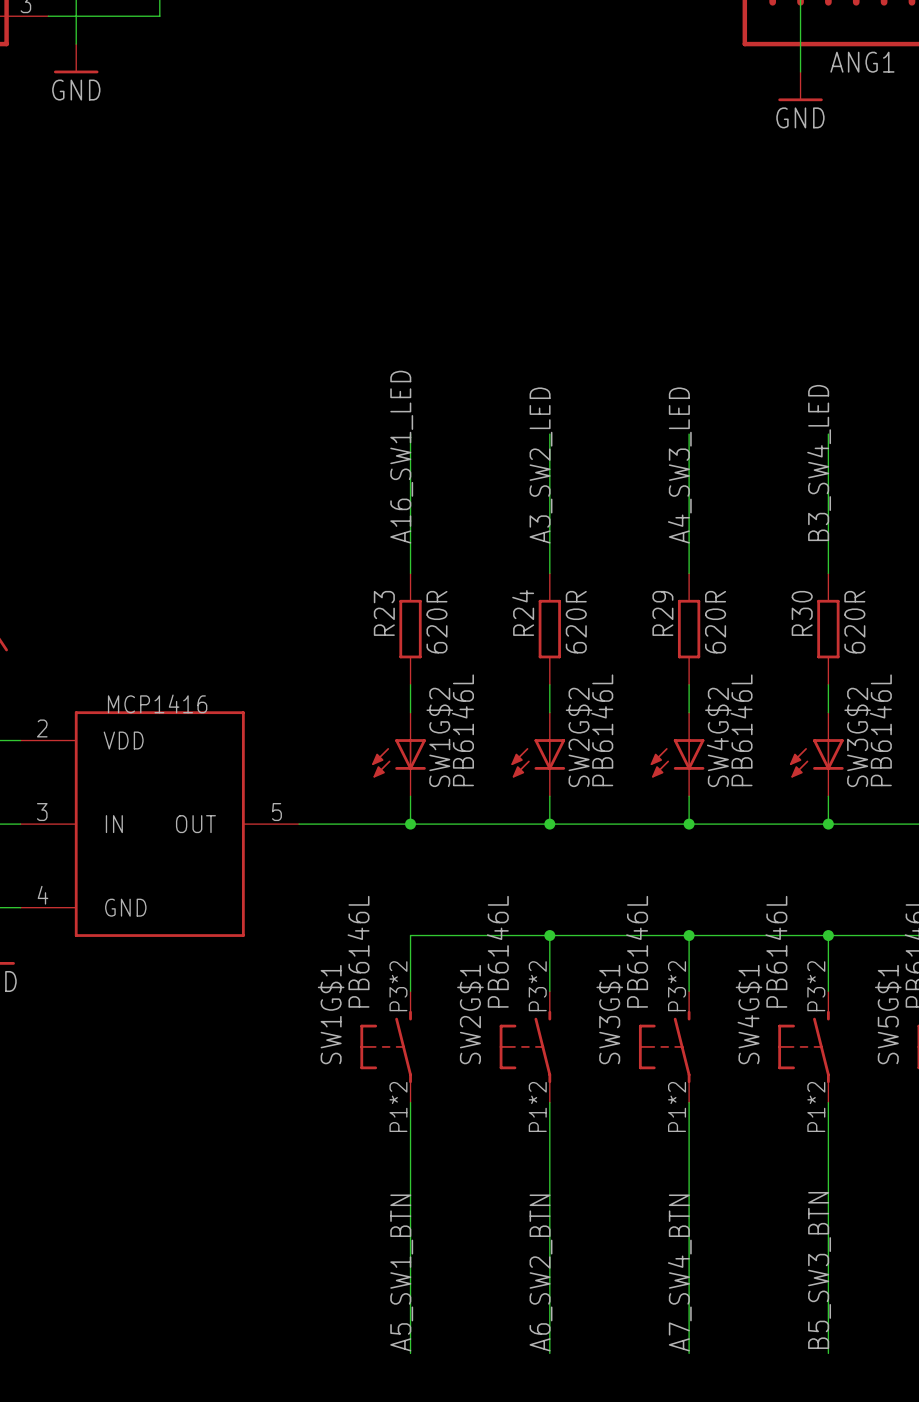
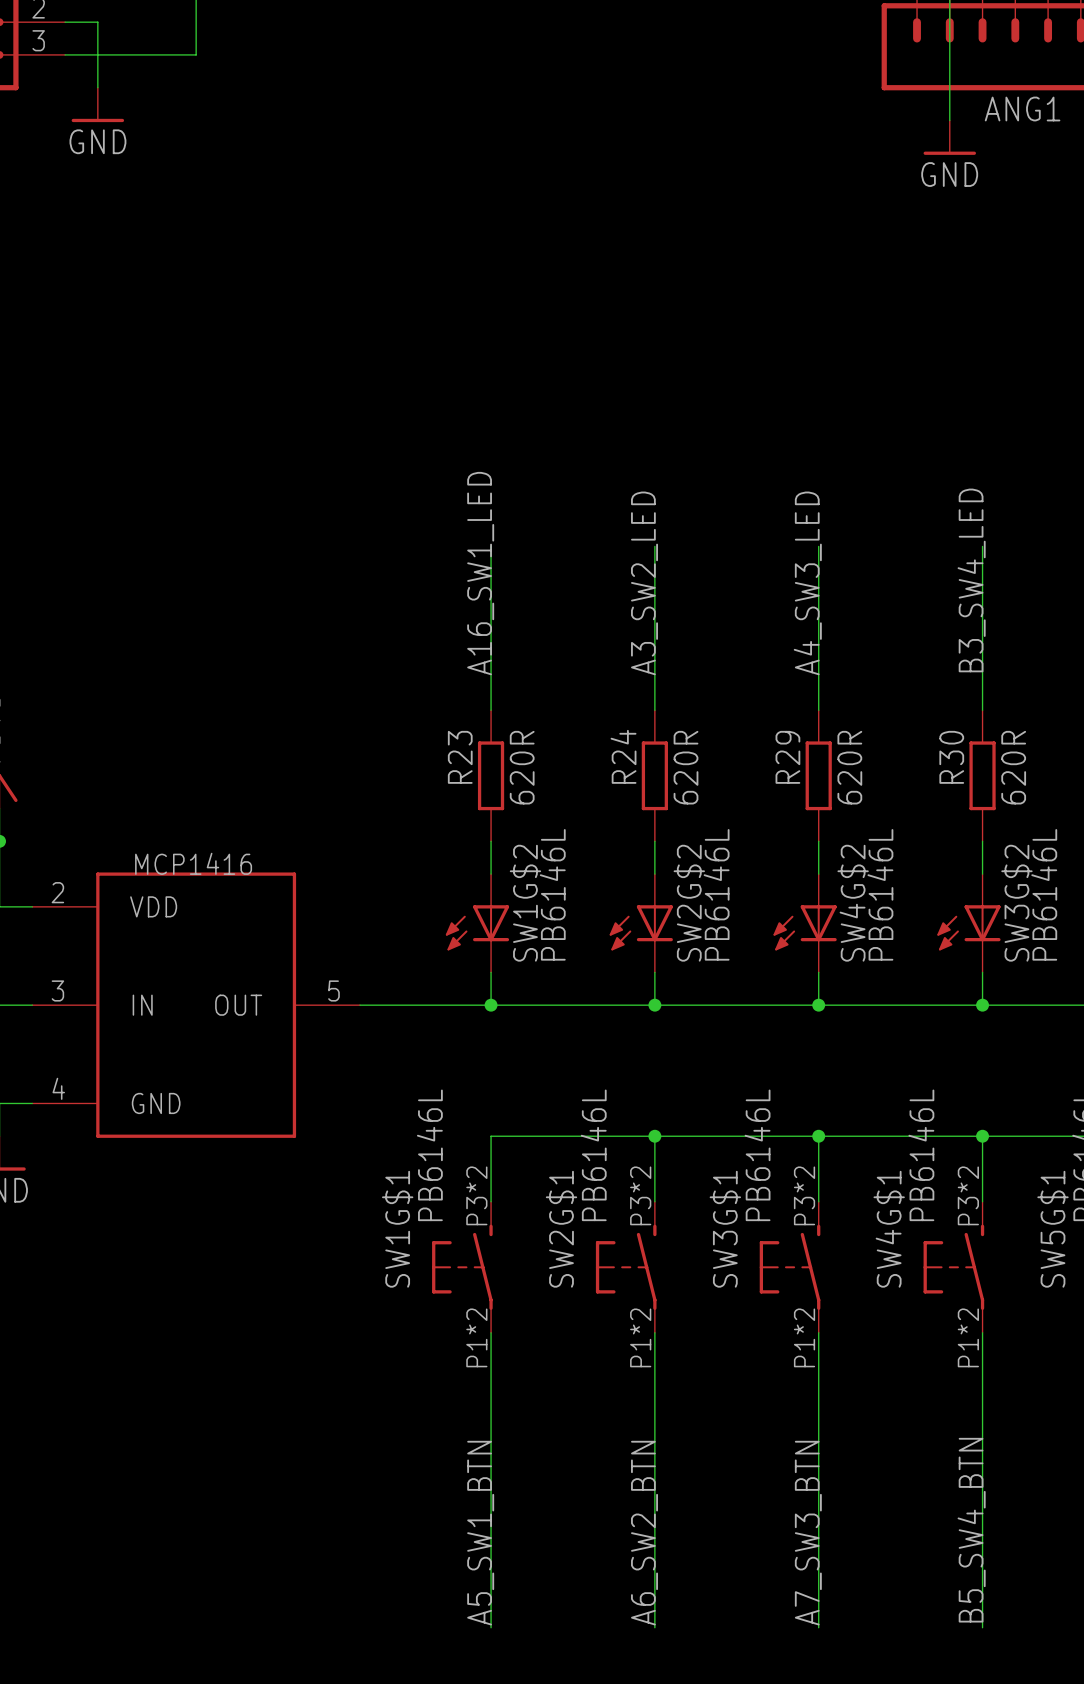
label: B5_SW3_BTN (819, 1270) -> B5_SW4_BTN (971, 1530)
label: A7_SW4_BTN (679, 1272) -> A7_SW3_BTN (808, 1533)

